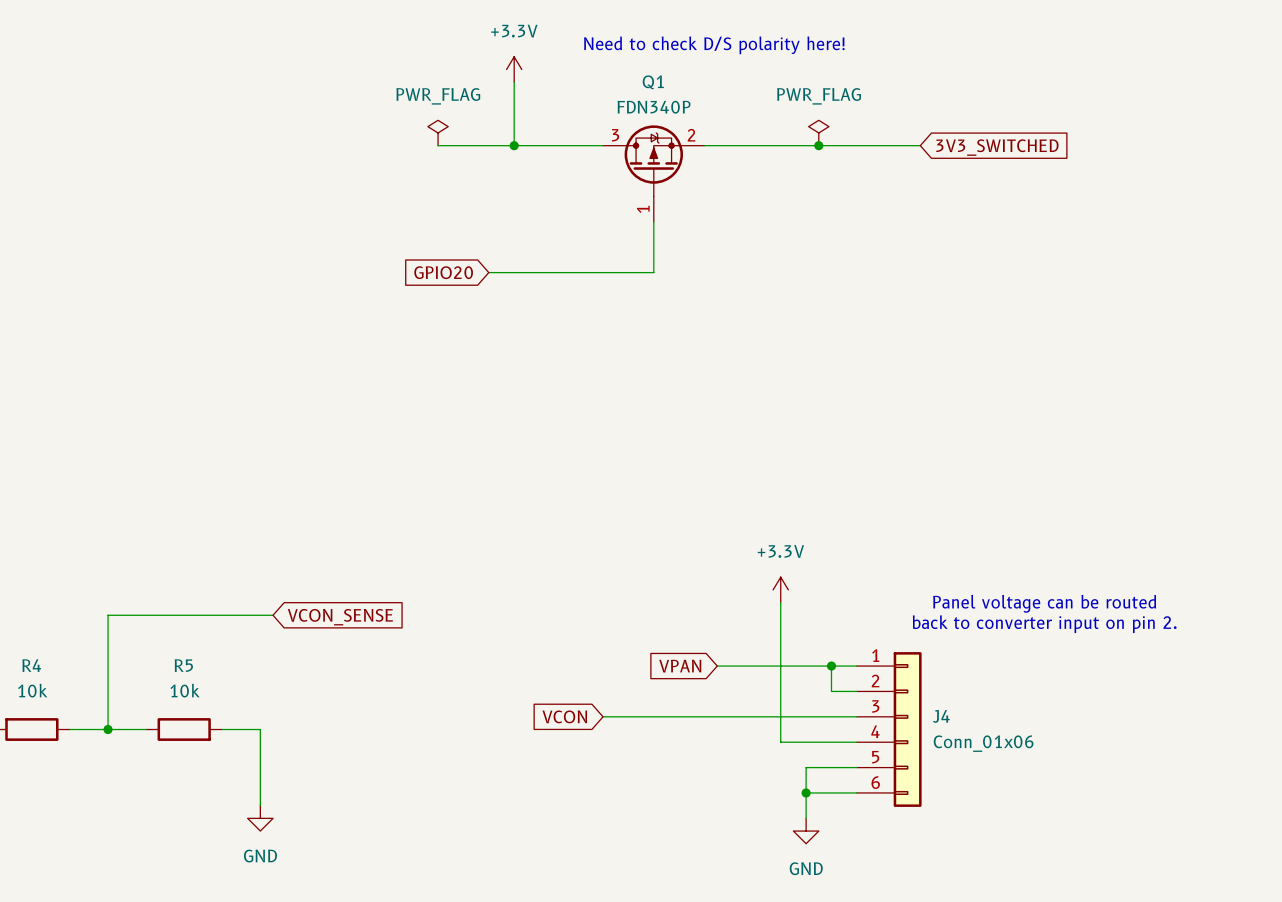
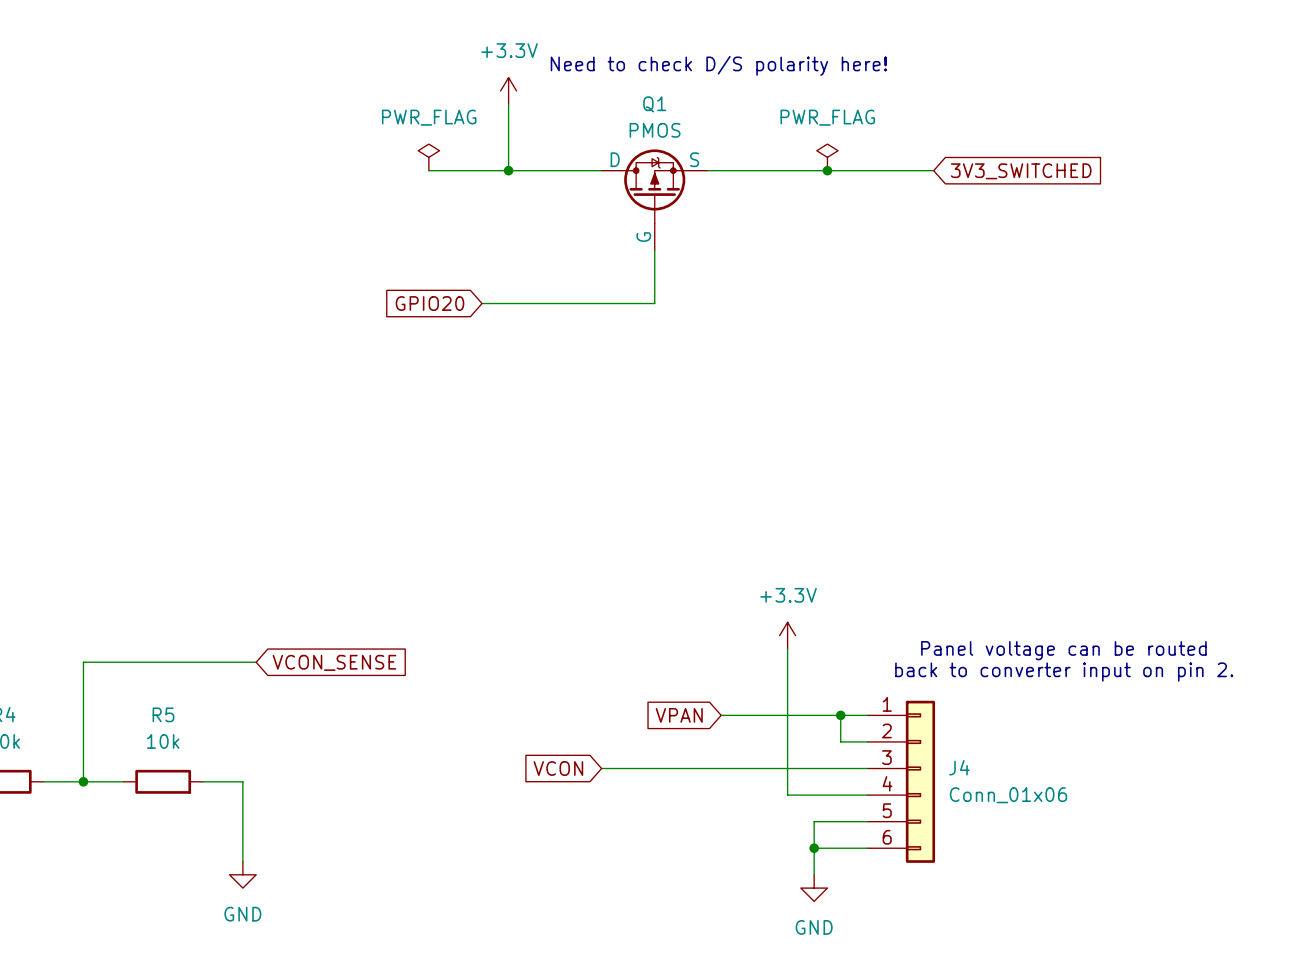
Q1 value: FDN340P (654, 107) -> PMOS (655, 130)
Q1 pin number: 3 (615, 135) -> none
Q1 pin name: none -> D (615, 159)
Q1 pin name: none -> S (694, 159)
Q1 pin number: 2 (691, 135) -> none
Q1 pin name: none -> G (643, 237)
Q1 pin number: 1 (643, 209) -> none

